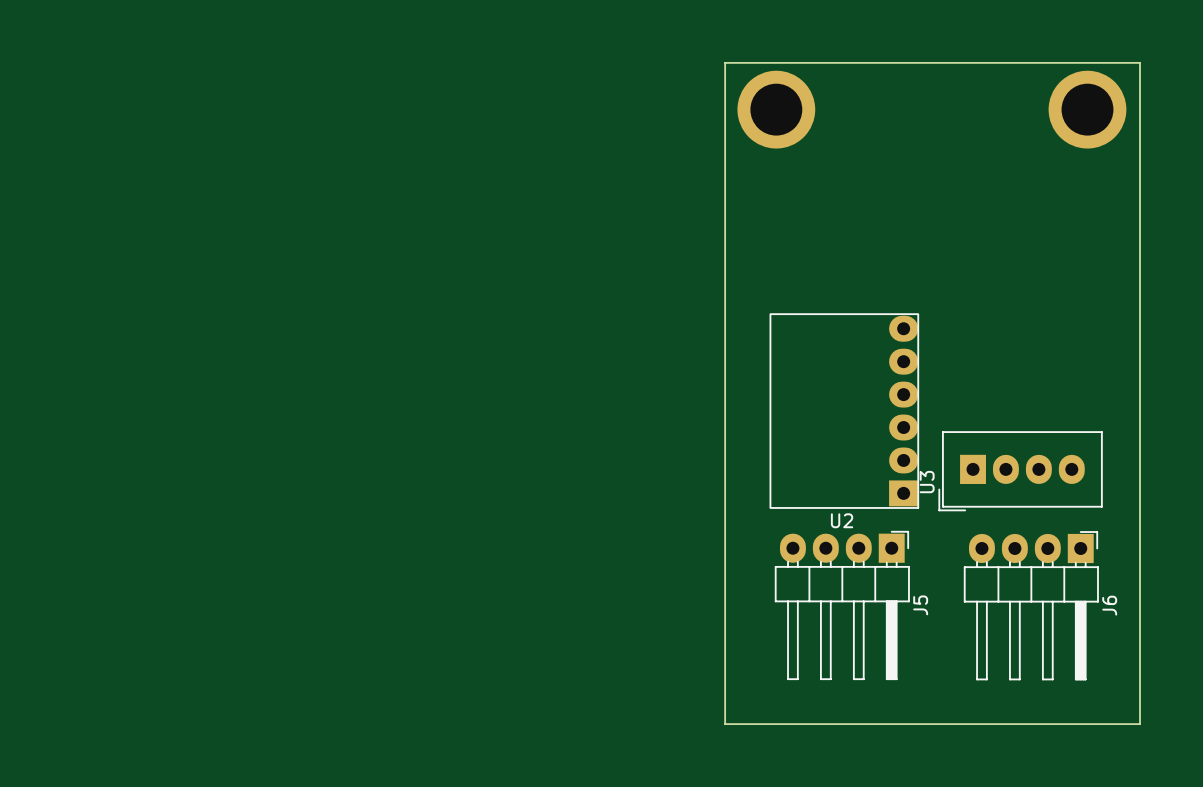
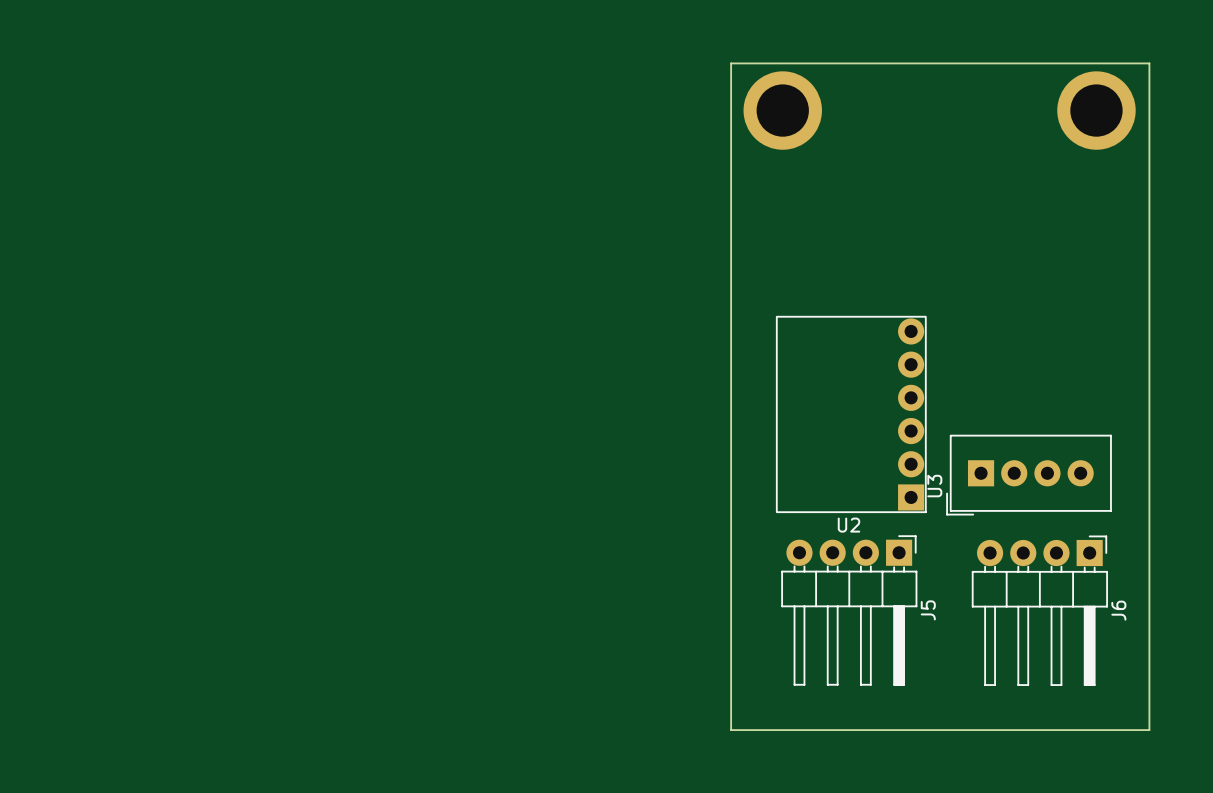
U2 footprint: [769, 313, 920, 509] -> [776, 315, 927, 513]
U3 footprint: [938, 431, 1103, 512] -> [946, 434, 1112, 516]
J5 footprint: [774, 530, 910, 680] -> [781, 535, 918, 686]
J6 footprint: [963, 531, 1099, 681] -> [971, 535, 1108, 686]

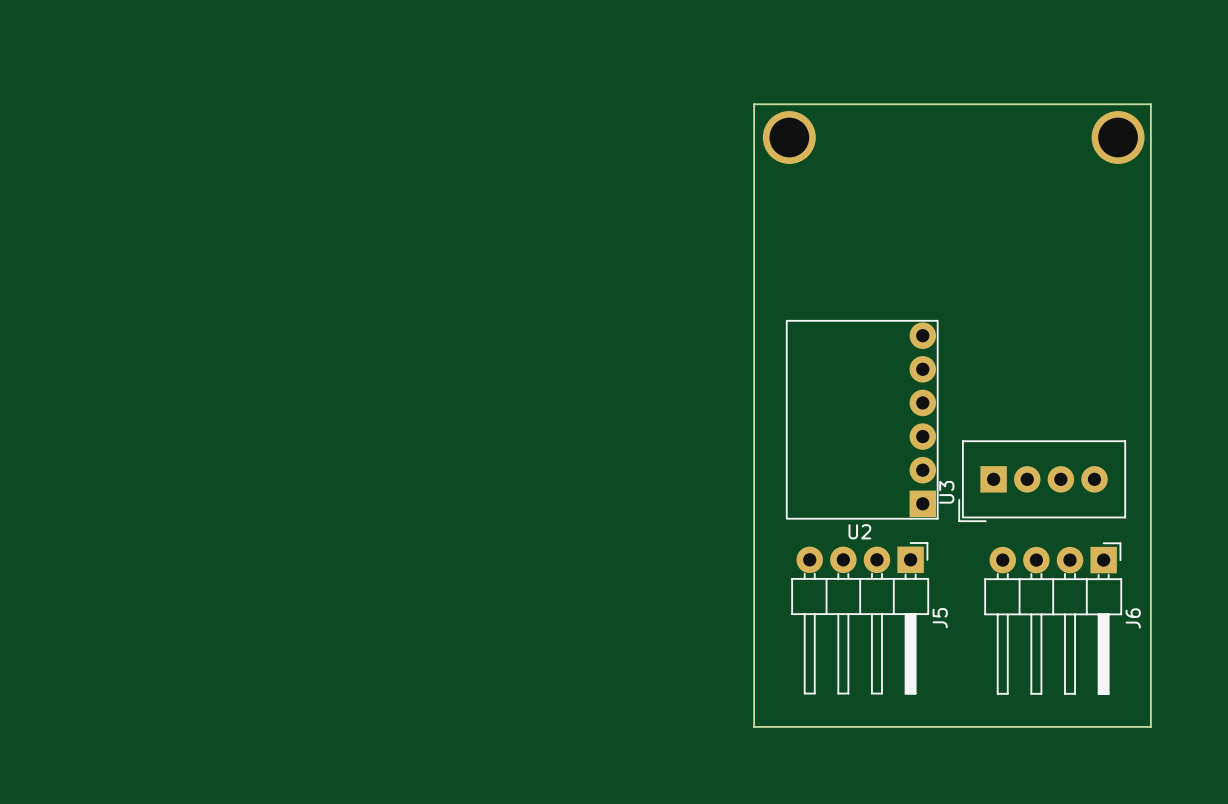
board edge: (731, 63) (1149, 63) (1149, 730) (731, 730) (731, 63) -> (754, 104) (754, 726) (1150, 726) (1150, 104) (754, 104)
part: (782, 110) -> none
part: (1096, 110) -> none
part: none -> (789, 137)
part: none -> (1118, 137)

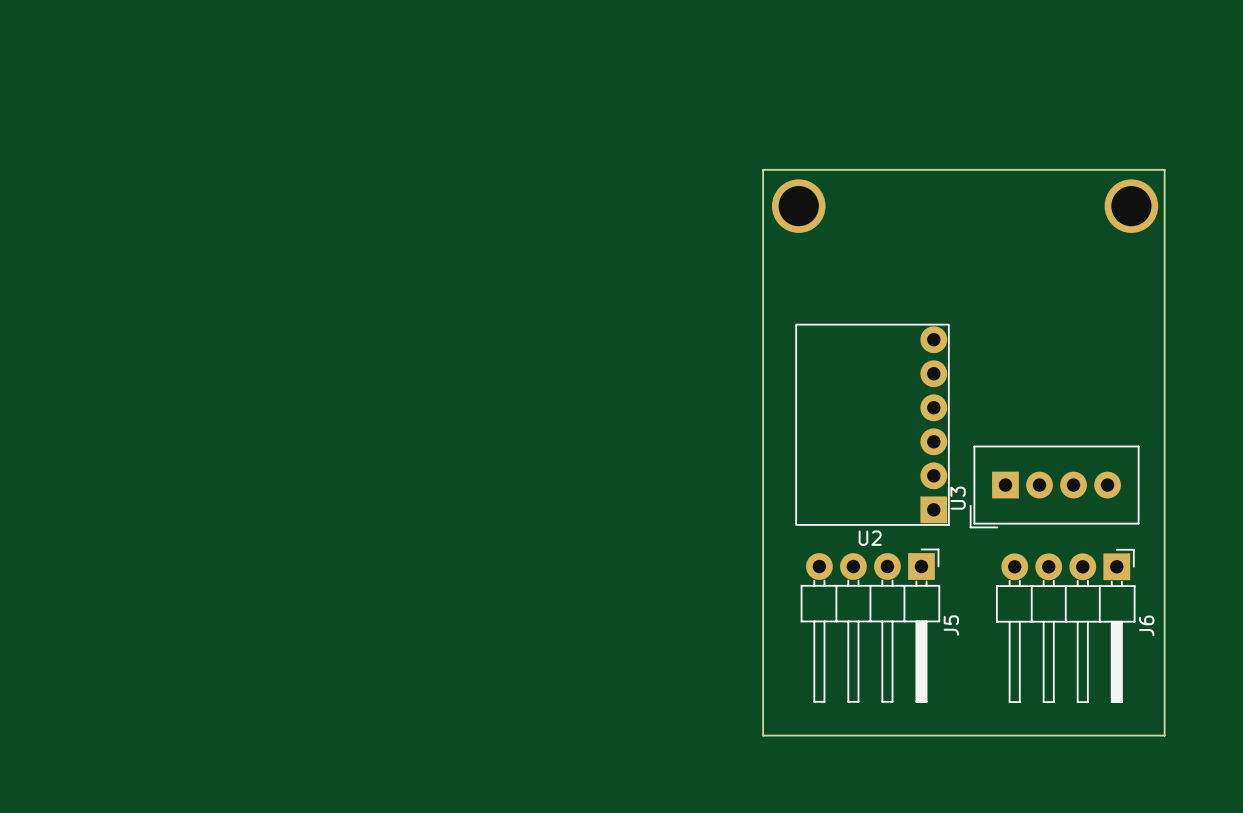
part position: (789, 137) -> (798, 206)
part position: (1118, 137) -> (1131, 206)
board edge: (754, 167) (754, 104) (1150, 104) (1150, 167) -> (763, 169) (1164, 169)

